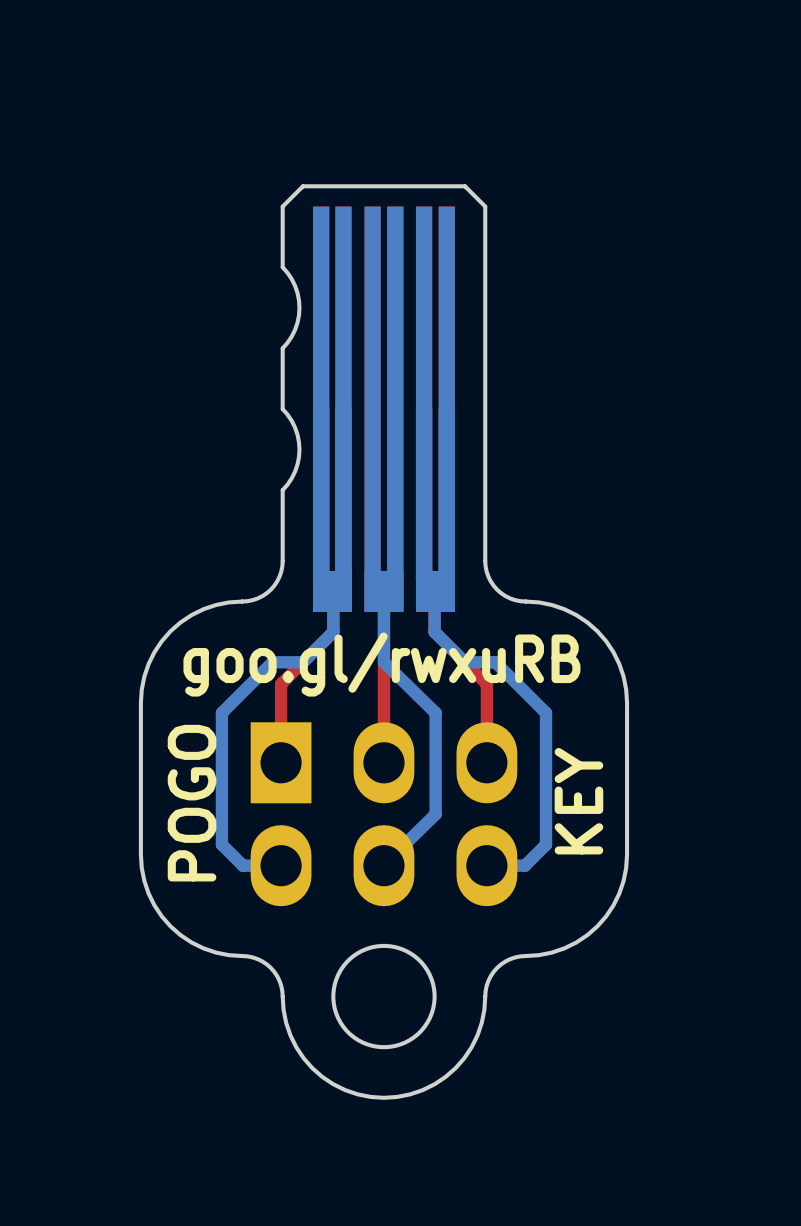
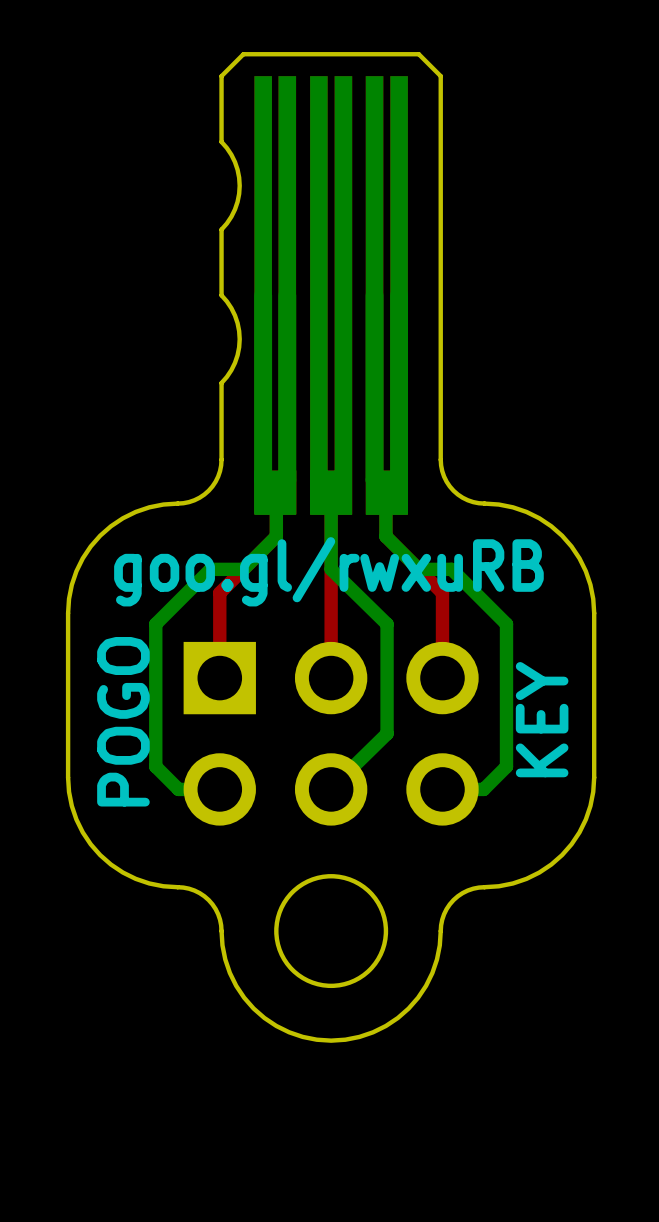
part footprint: [250, 722, 518, 907] -> [183, 641, 479, 826]

